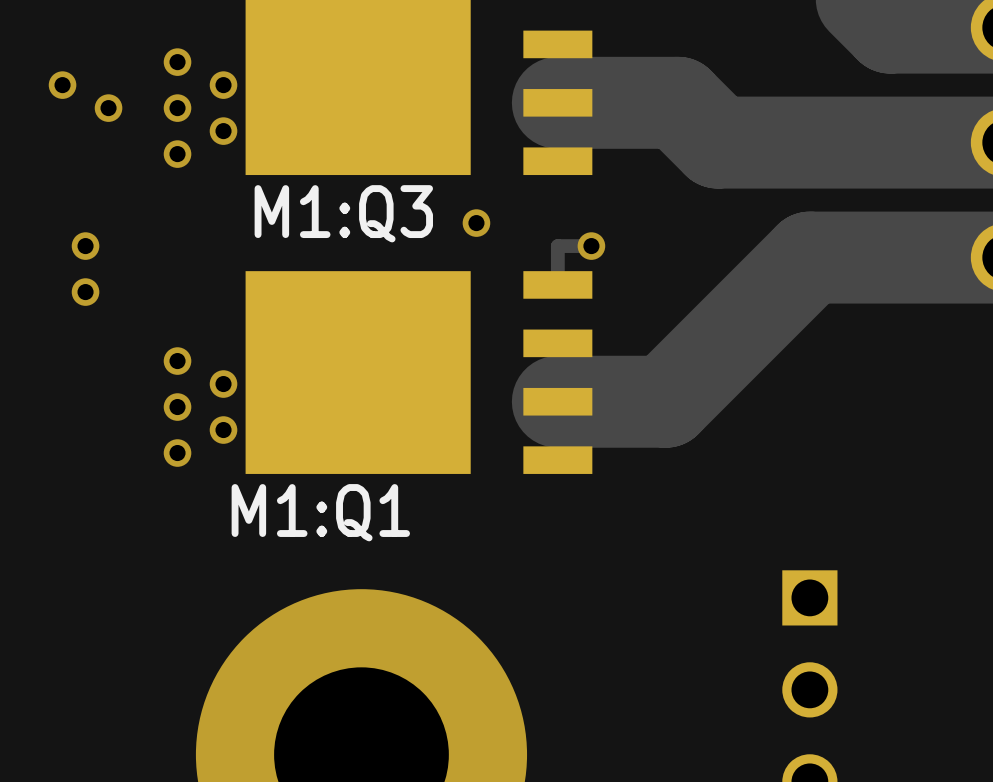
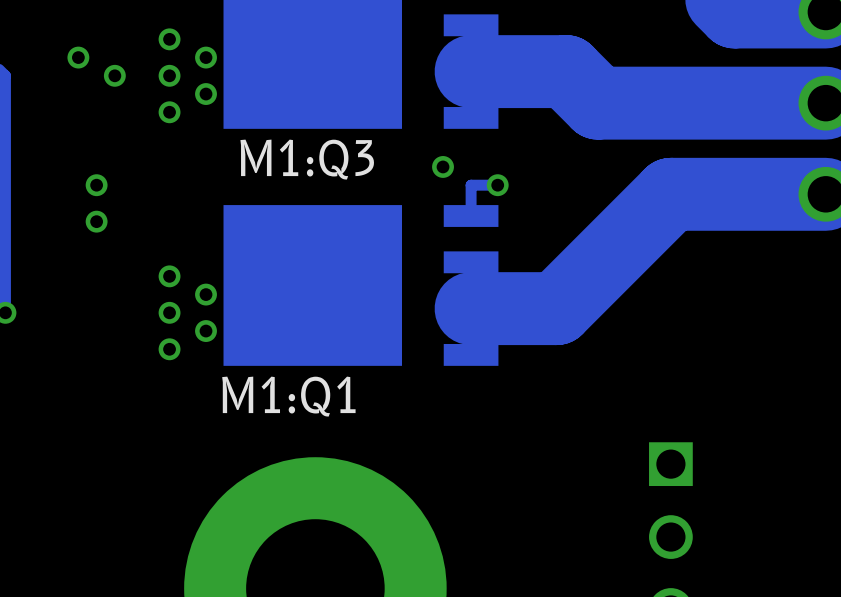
via position: (476, 223) -> (443, 166)

